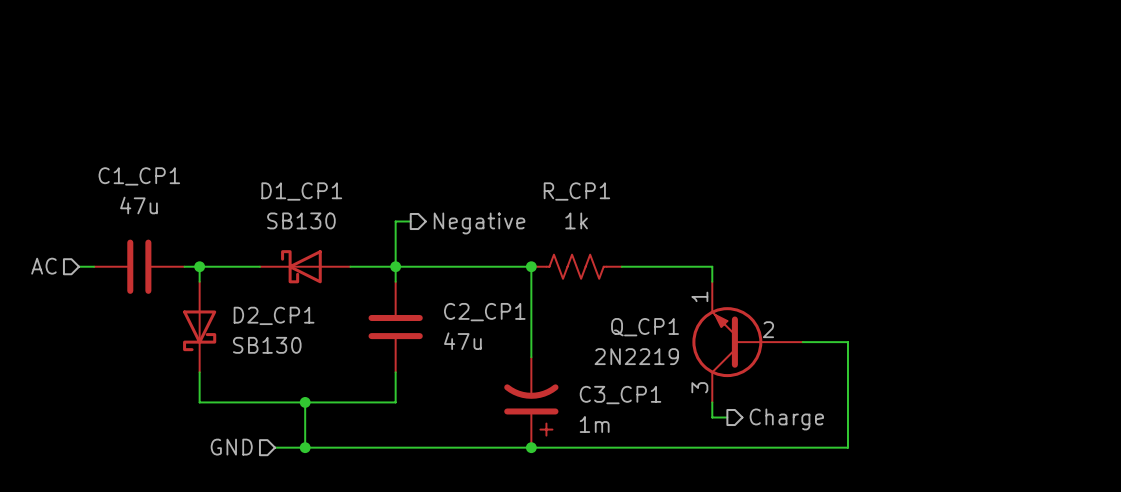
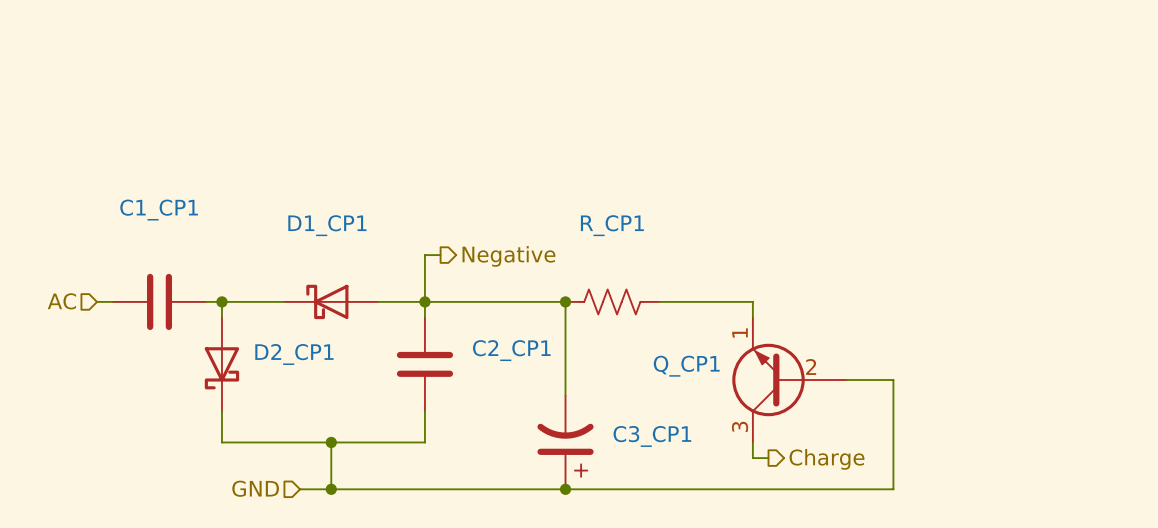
C1_CP1 value: 47u (138, 205) -> none
D1_CP1 value: SB130 (301, 220) -> none
R_CP1 value: 1k (576, 220) -> none
C2_CP1 value: 47u (462, 341) -> none
D2_CP1 value: SB130 (267, 345) -> none
Q_CP1 value: 2N2219 (636, 356) -> none
C3_CP1 value: 1m (594, 424) -> none

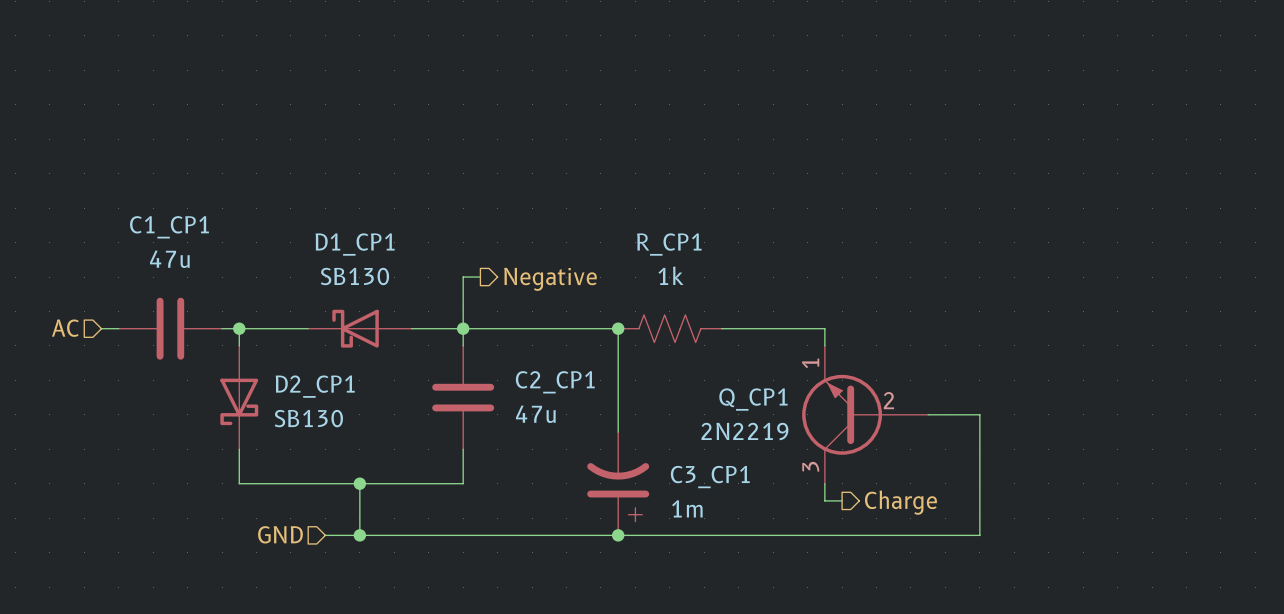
C1_CP1 value: none -> 47u (169, 259)
D1_CP1 value: none -> SB130 (354, 276)
R_CP1 value: none -> 1k (670, 275)
C2_CP1 value: none -> 47u (535, 414)
D2_CP1 value: none -> SB130 (308, 418)
Q_CP1 value: none -> 2N2219 (744, 431)
C3_CP1 value: none -> 1m (687, 508)

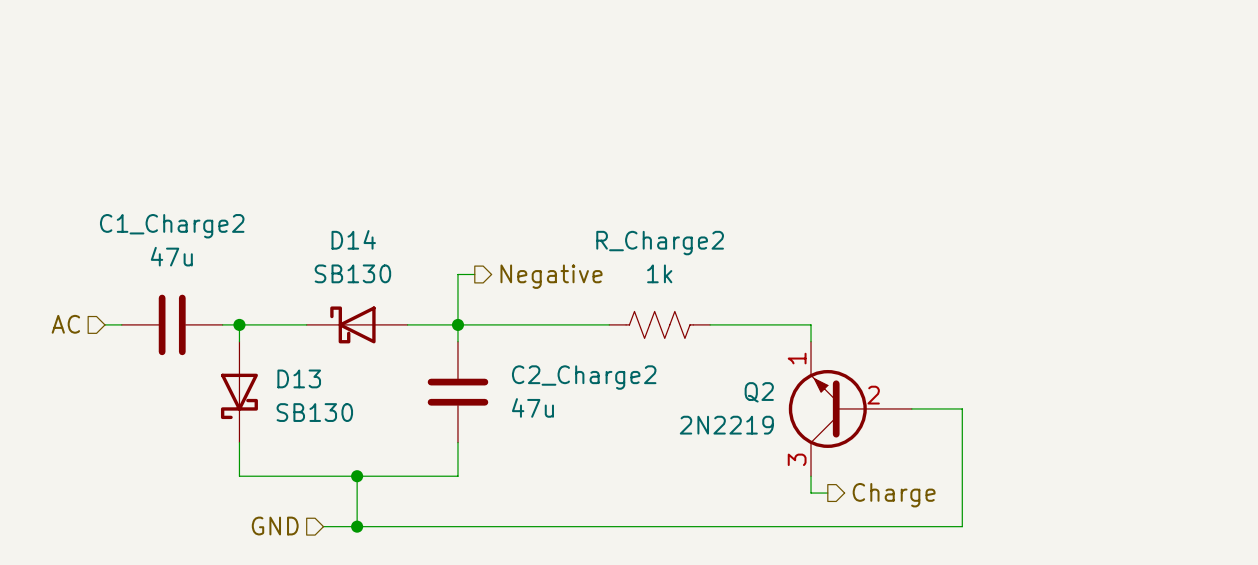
C1_CP1 name: C1_CP1 (169, 227) -> C1_Charge2 (172, 226)
D1_CP1 name: D1_CP1 (355, 244) -> D14 (353, 239)
R_CP1 name: R_CP1 (669, 244) -> R_Charge2 (660, 243)
wire: (618, 328) (618, 432) -> none
junction: (618, 328) -> none
C2_CP1 name: C2_CP1 (555, 382) -> C2_Charge2 (584, 377)
D2_CP1 name: D2_CP1 (315, 386) -> D13 (299, 378)
Q_CP1 name: Q_CP1 (753, 399) -> Q2 (759, 392)
C3_CP1: 1m (618, 483) -> none
junction: (618, 535) -> none

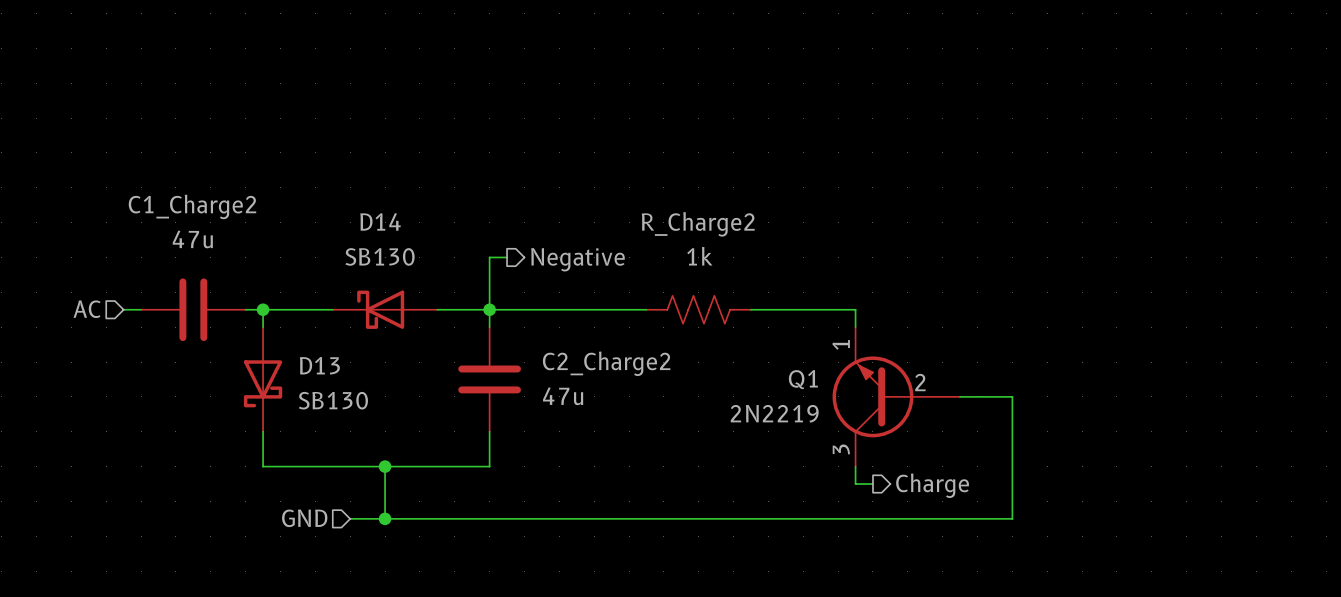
Q2 name: Q2 (759, 392) -> Q1 (803, 379)

